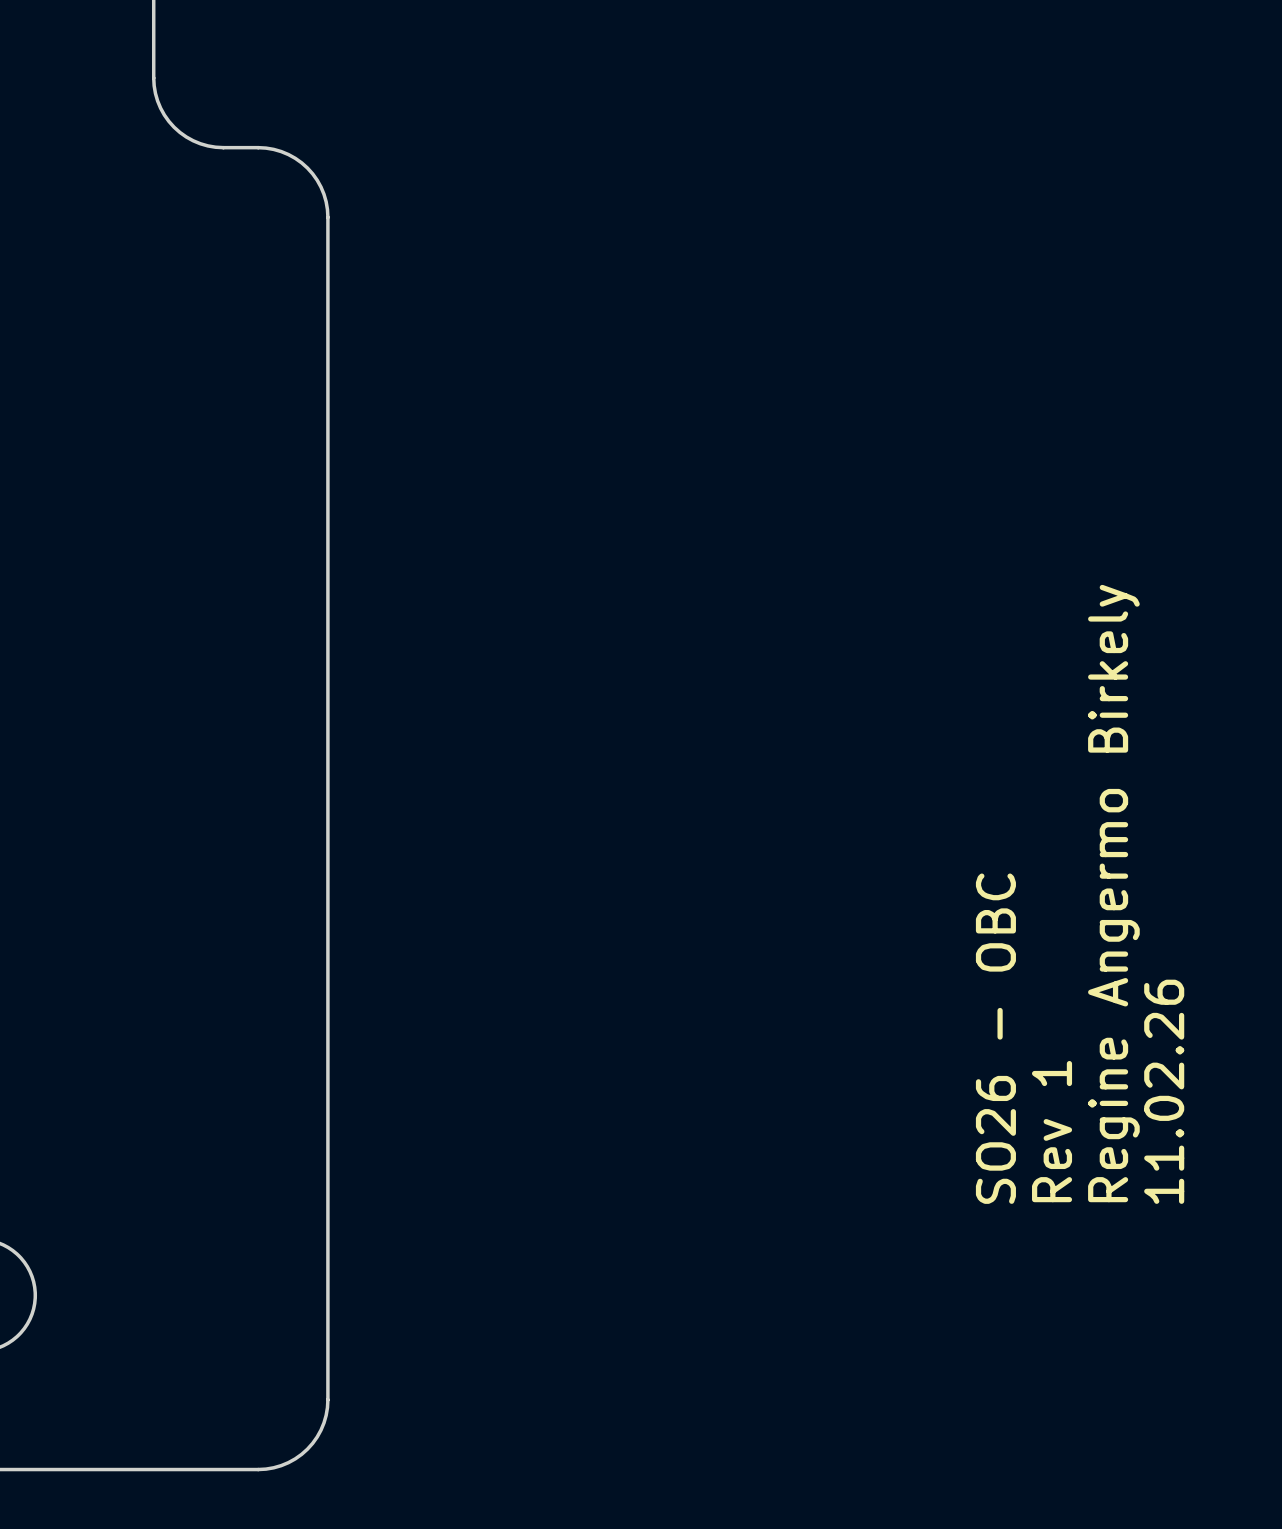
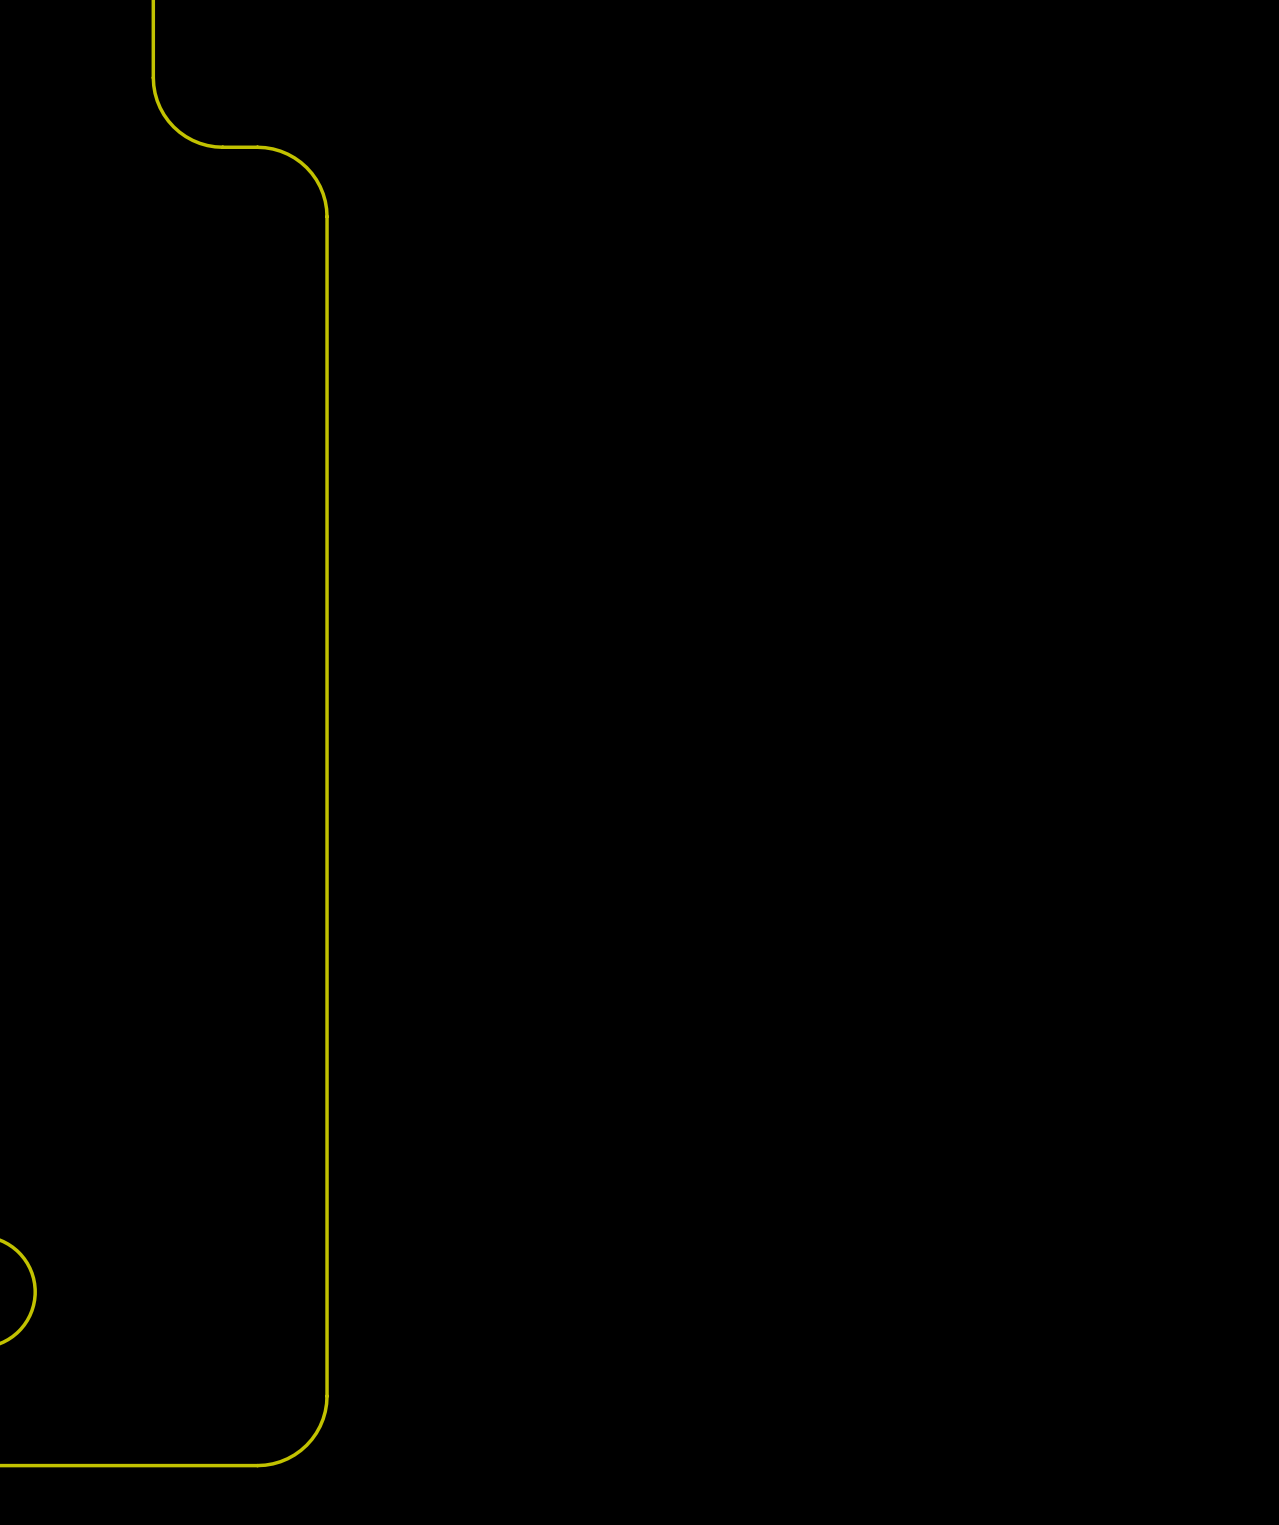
text: Regine Angermo Birkely (1113, 893) -> none
text: SO26 - OBC (995, 1038) -> none
text: 11.02.26 (1164, 1091) -> none
text: Rev 1 (1052, 1131) -> none

